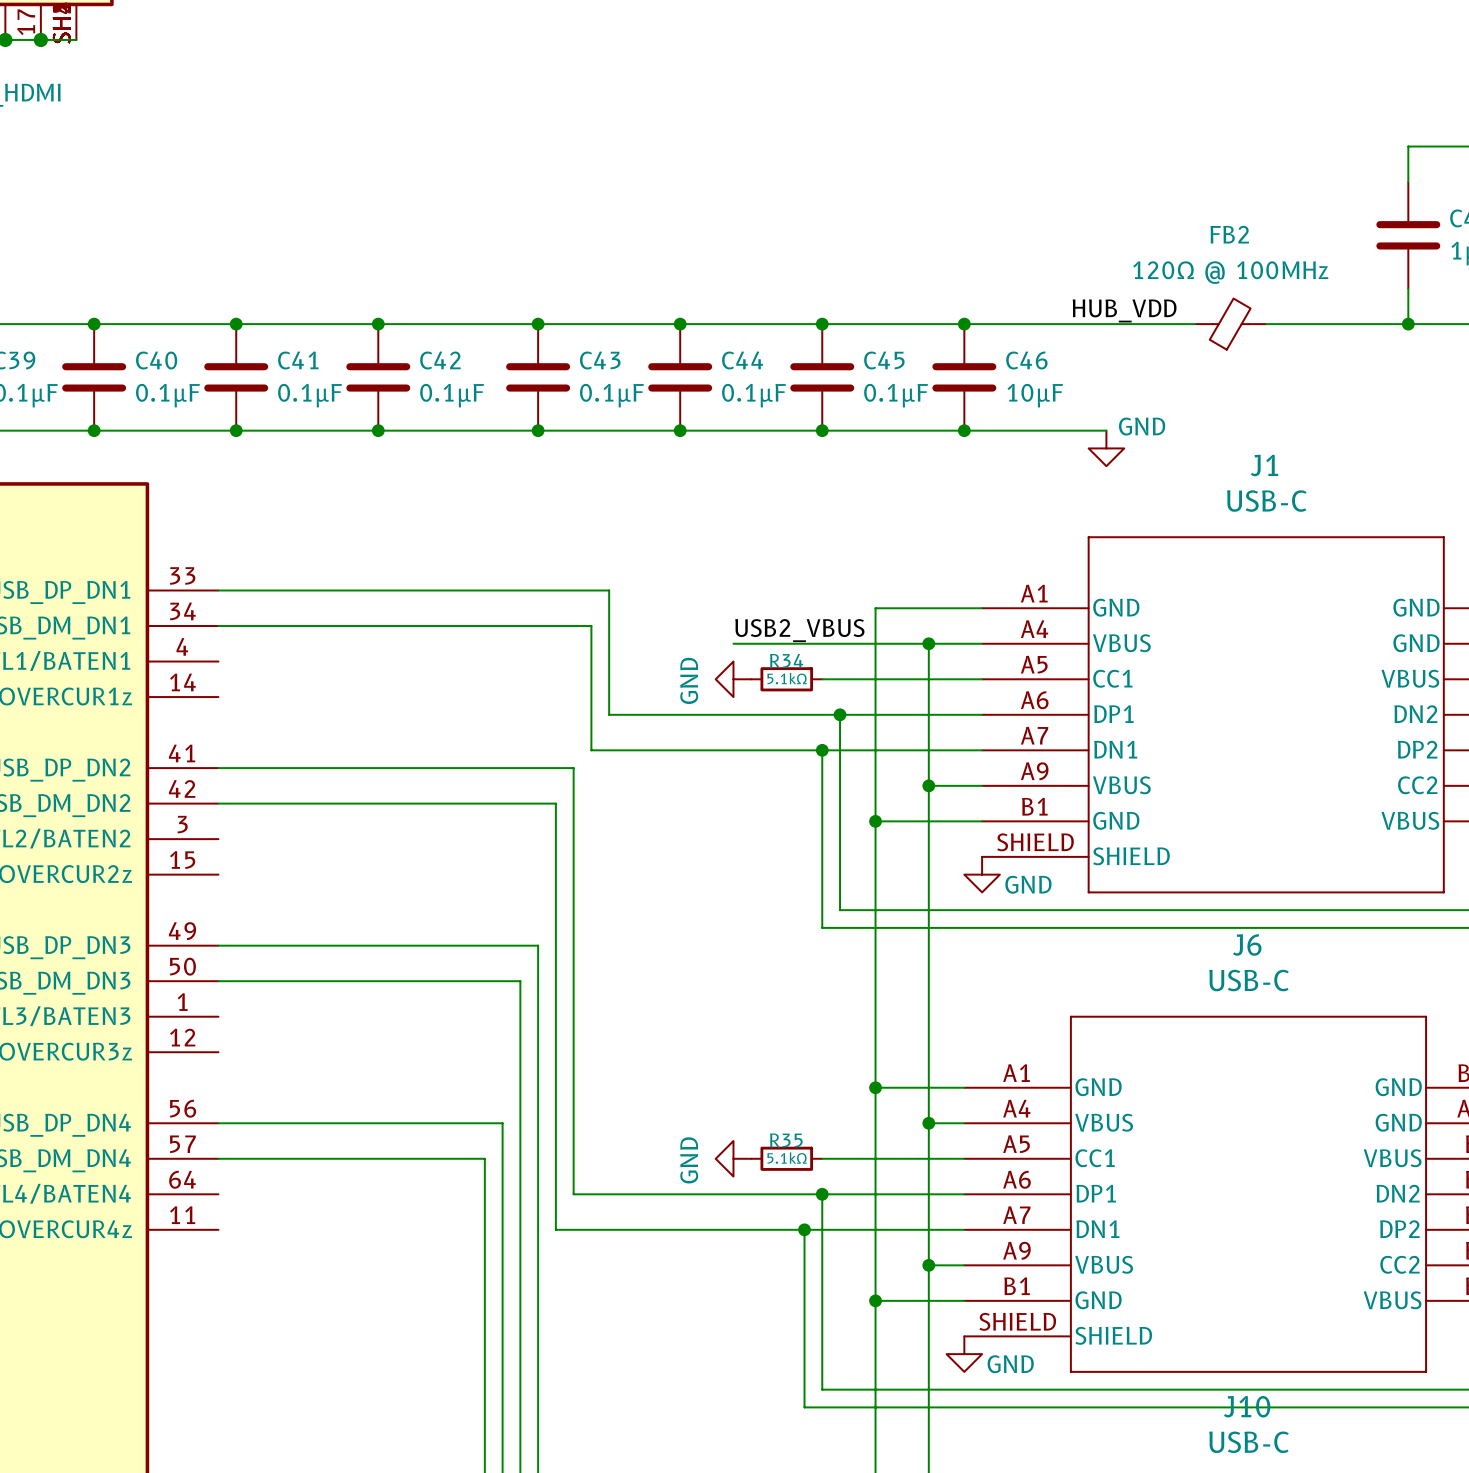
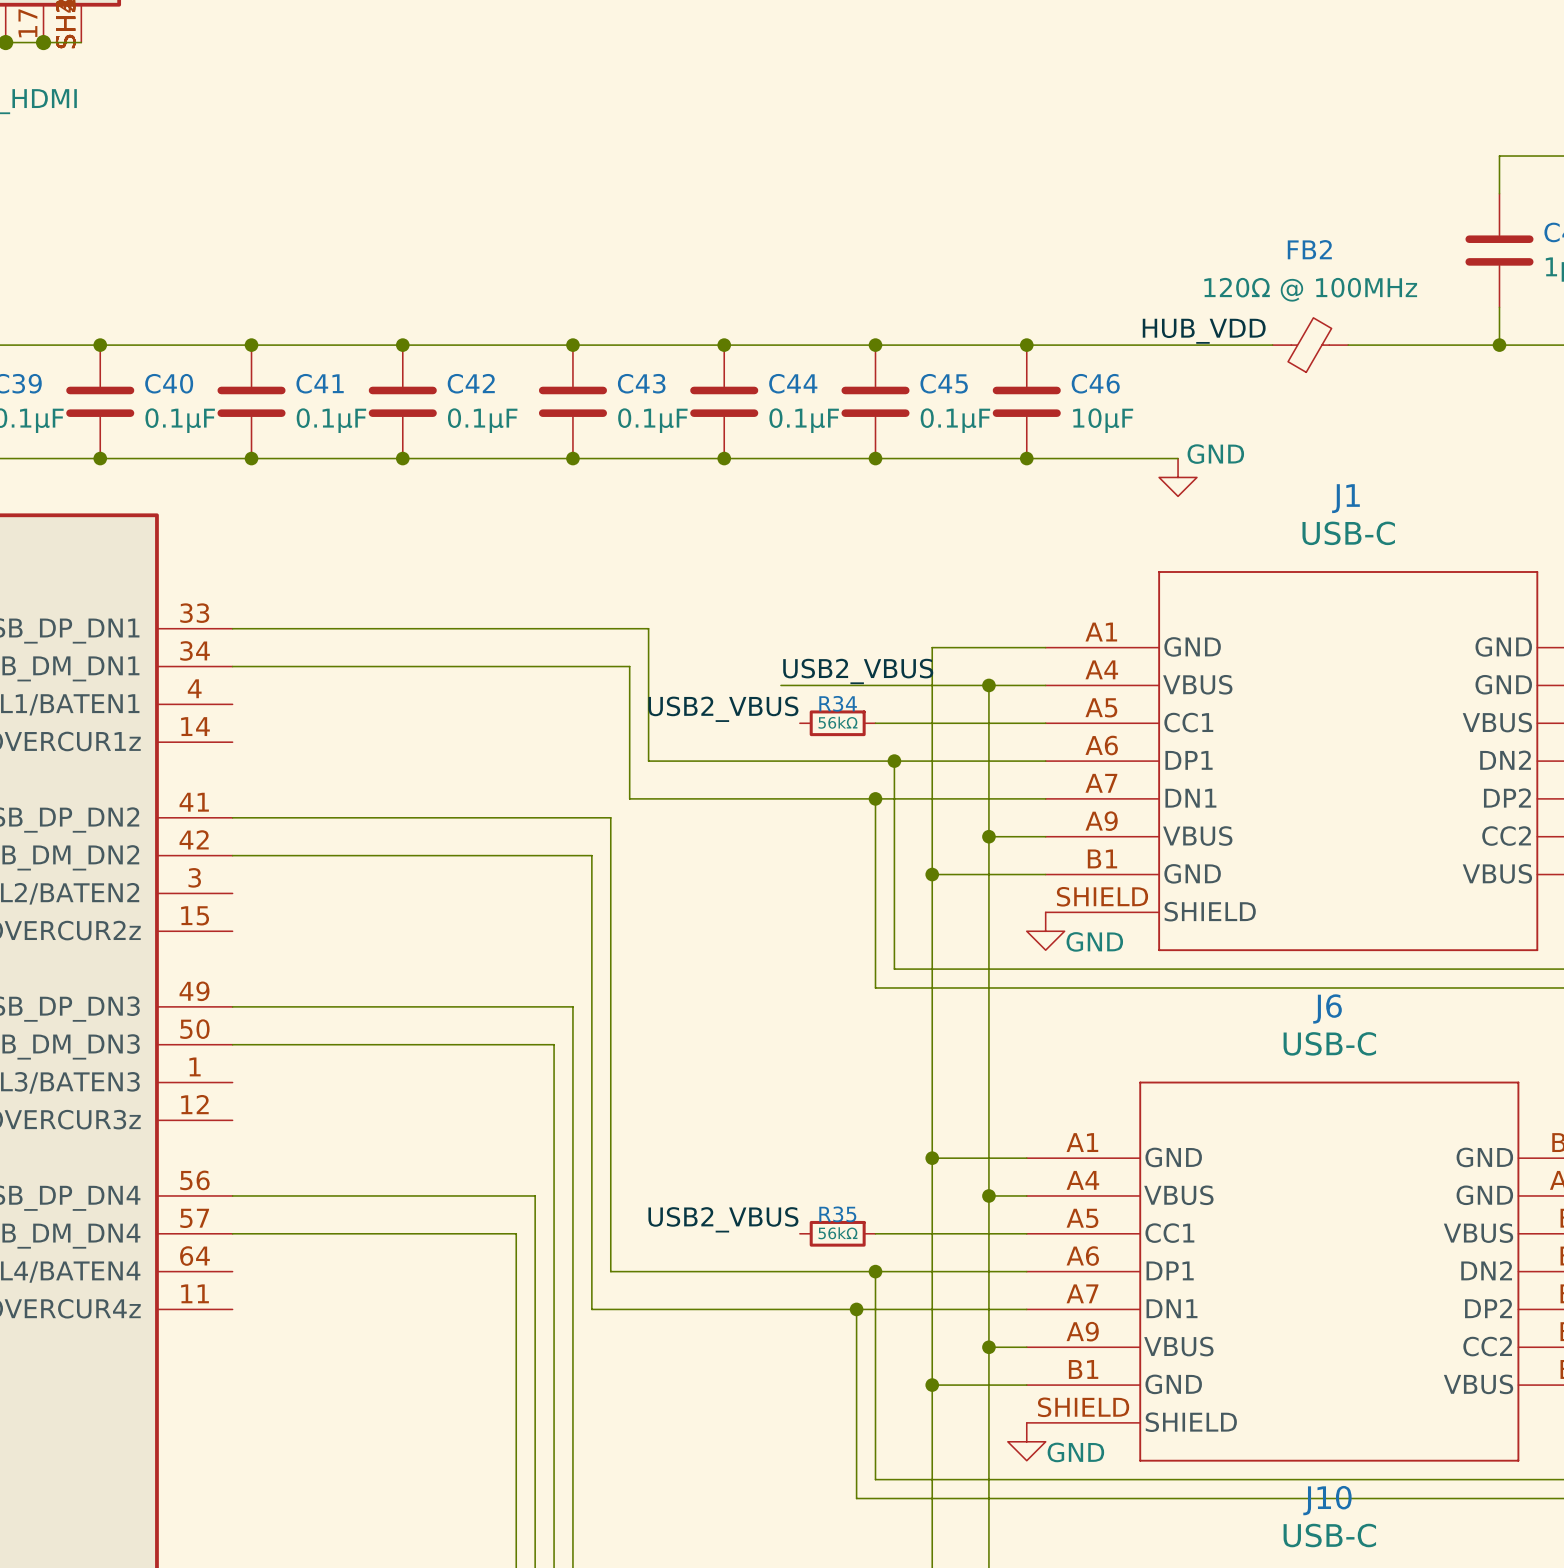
label: none -> USB2_VBUS (723, 709)
R34 value: 5.1kΩ (787, 678) -> 56kΩ (837, 722)
power symbol: GND (733, 679) -> none
label: none -> USB2_VBUS (723, 1219)
power symbol: GND (733, 1158) -> none
R35 value: 5.1kΩ (787, 1158) -> 56kΩ (837, 1233)

